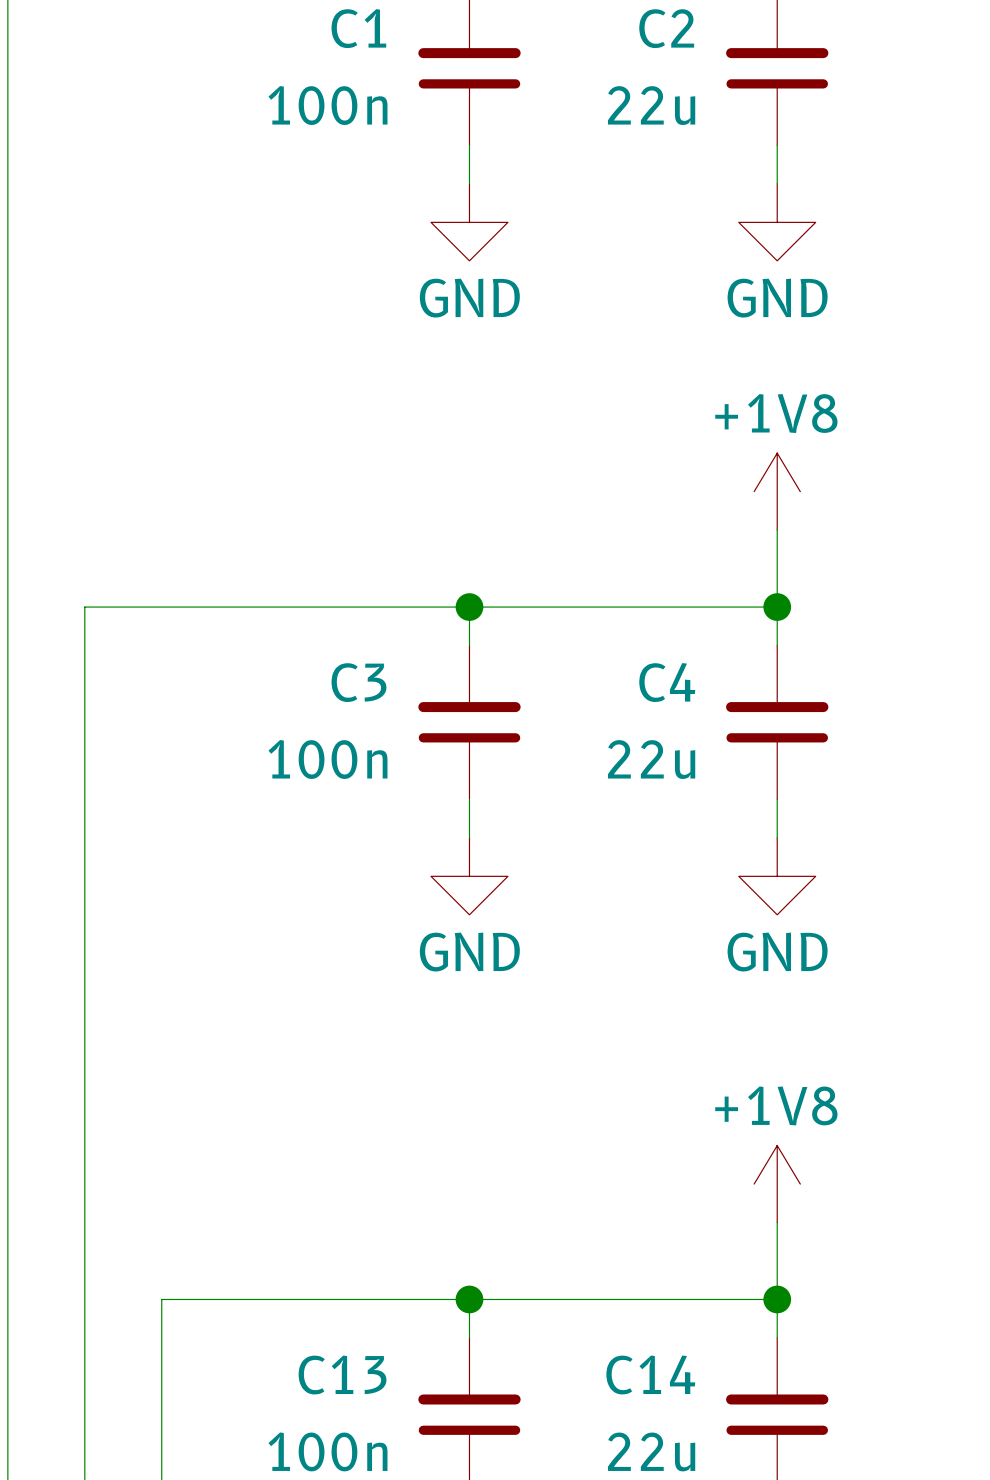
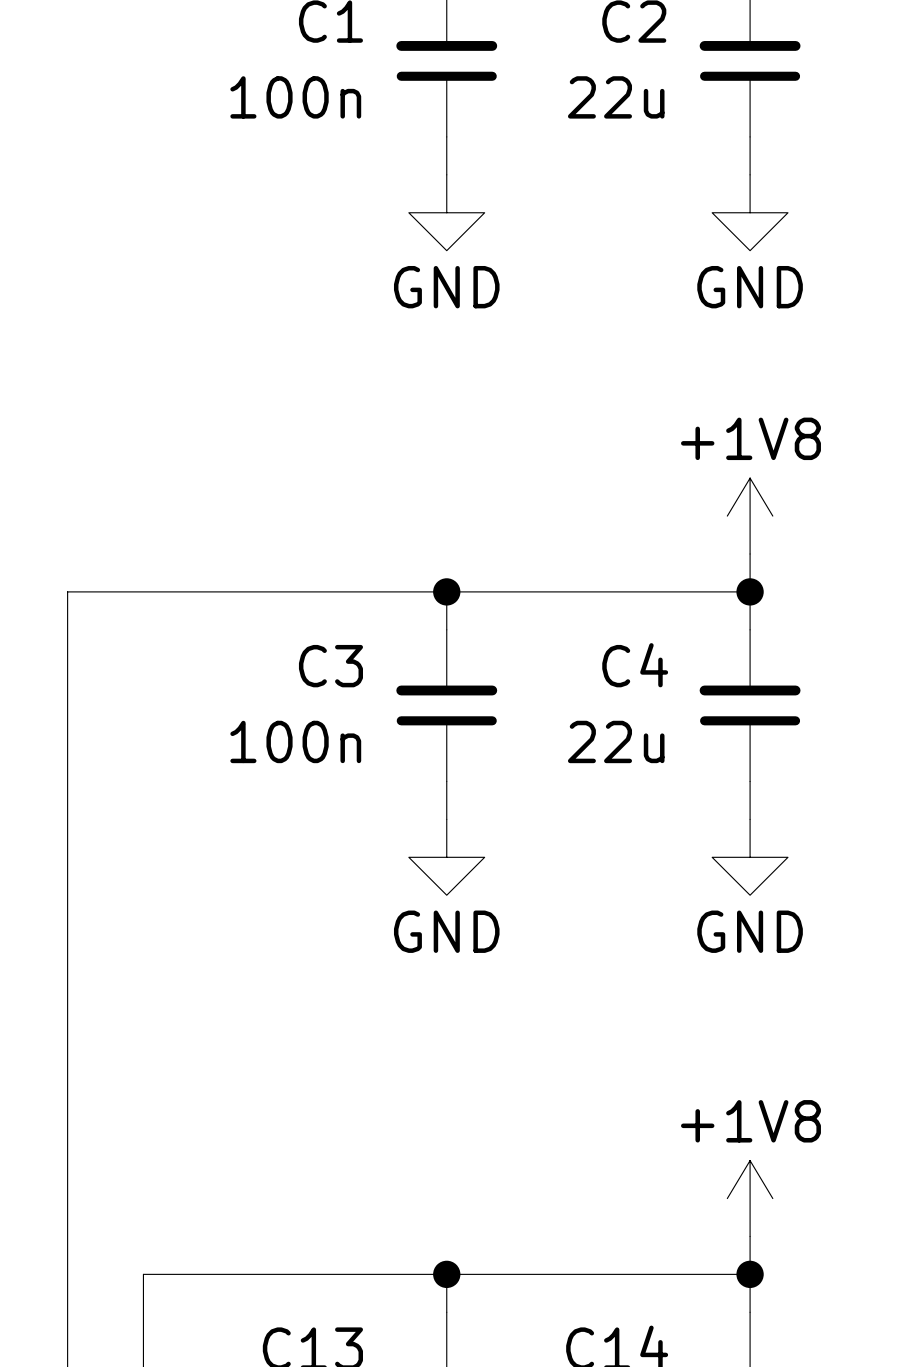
power symbol position: +1V8 (777, 491) -> +1V8 (750, 516)
power symbol position: +1V8 (777, 1184) -> +1V8 (750, 1198)

